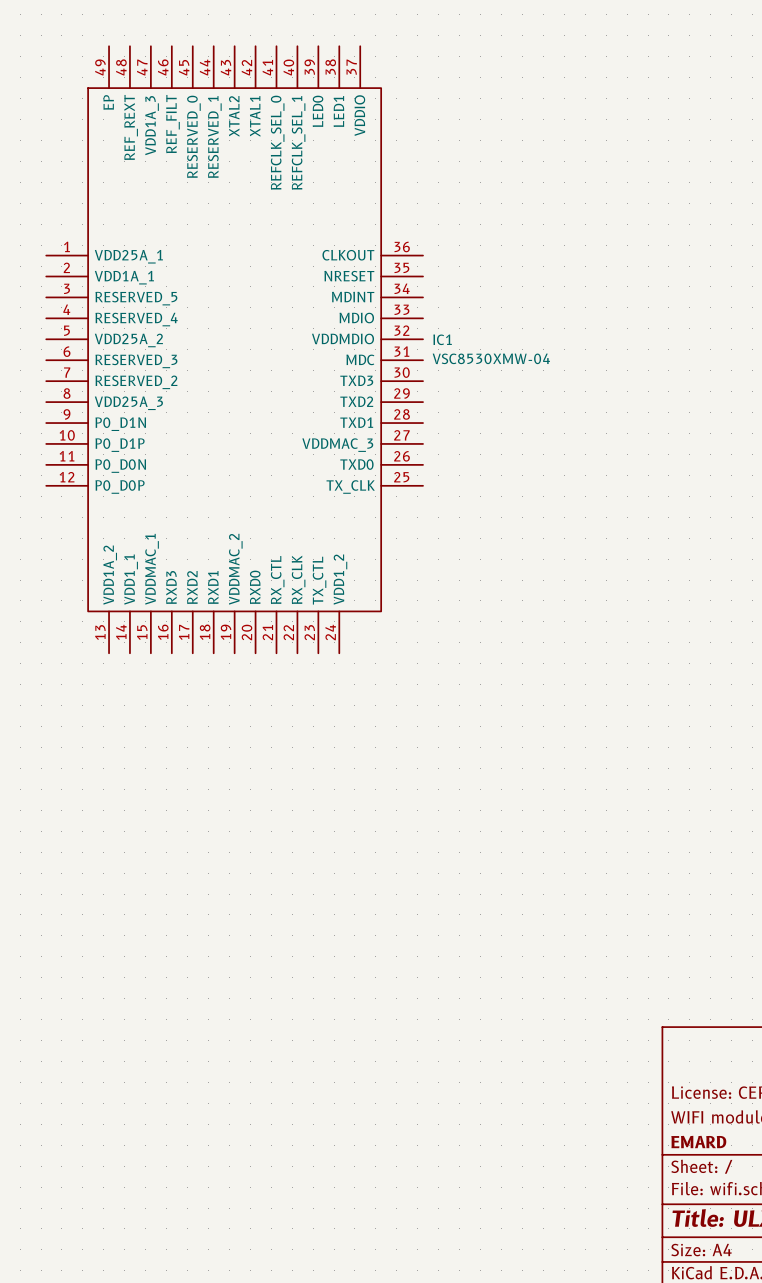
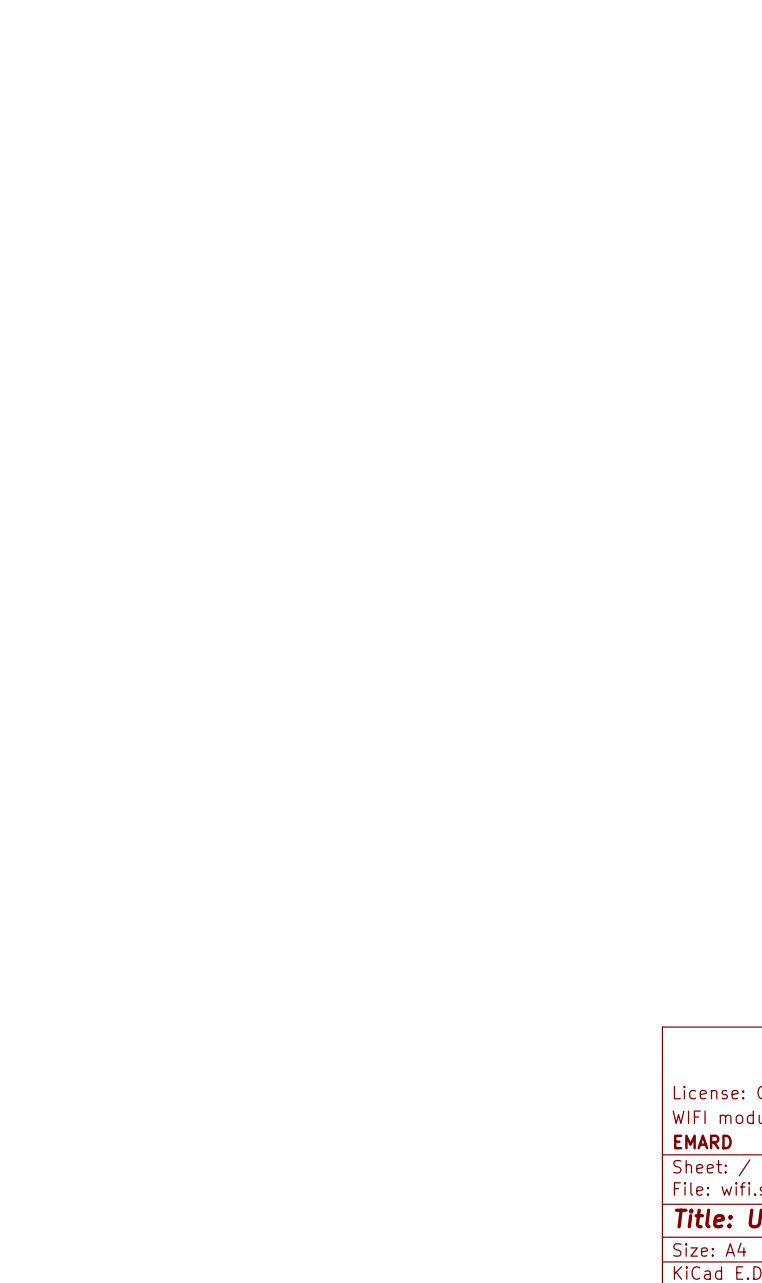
IC1: VSC8530XMW-04 (234, 349) -> none

